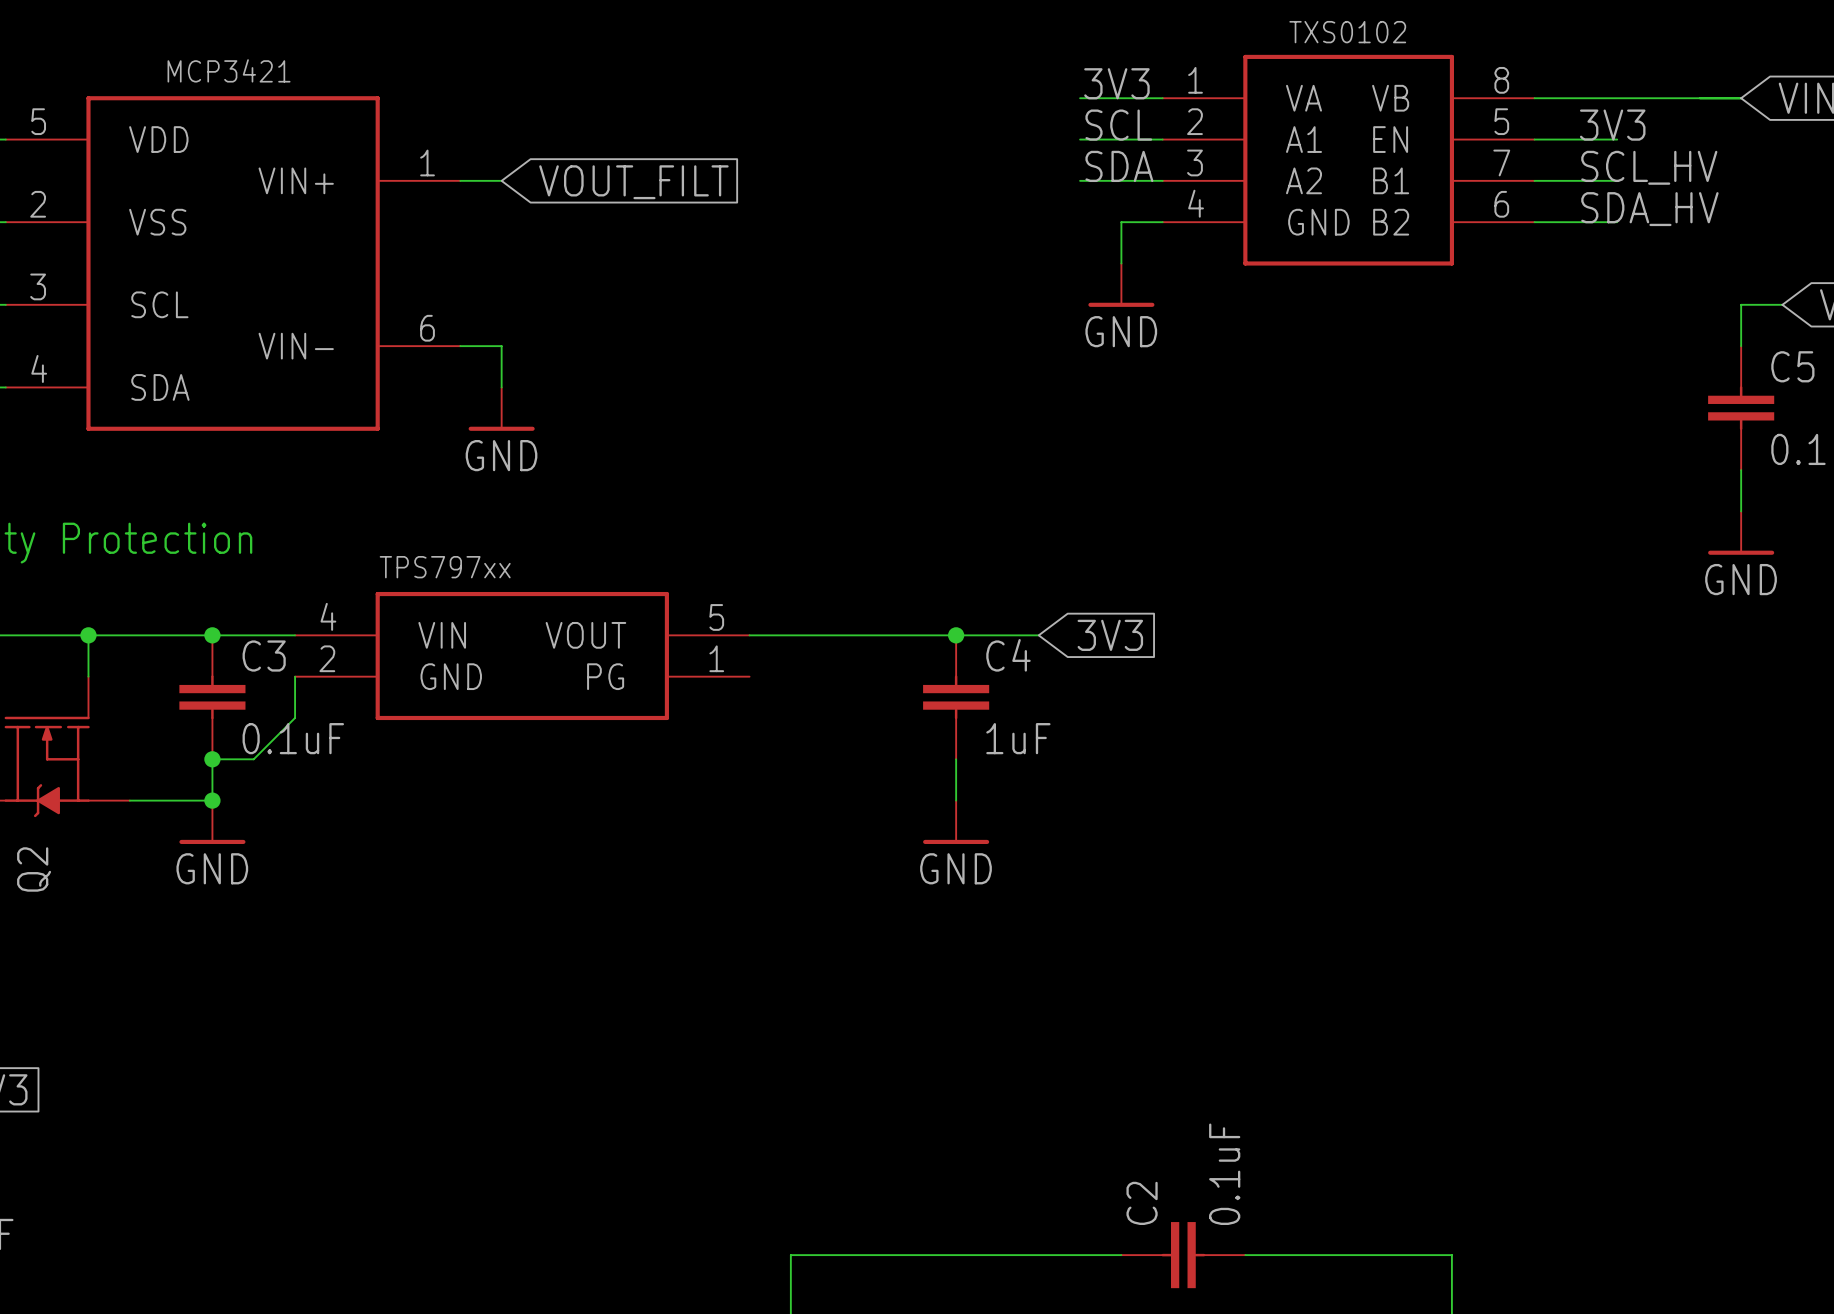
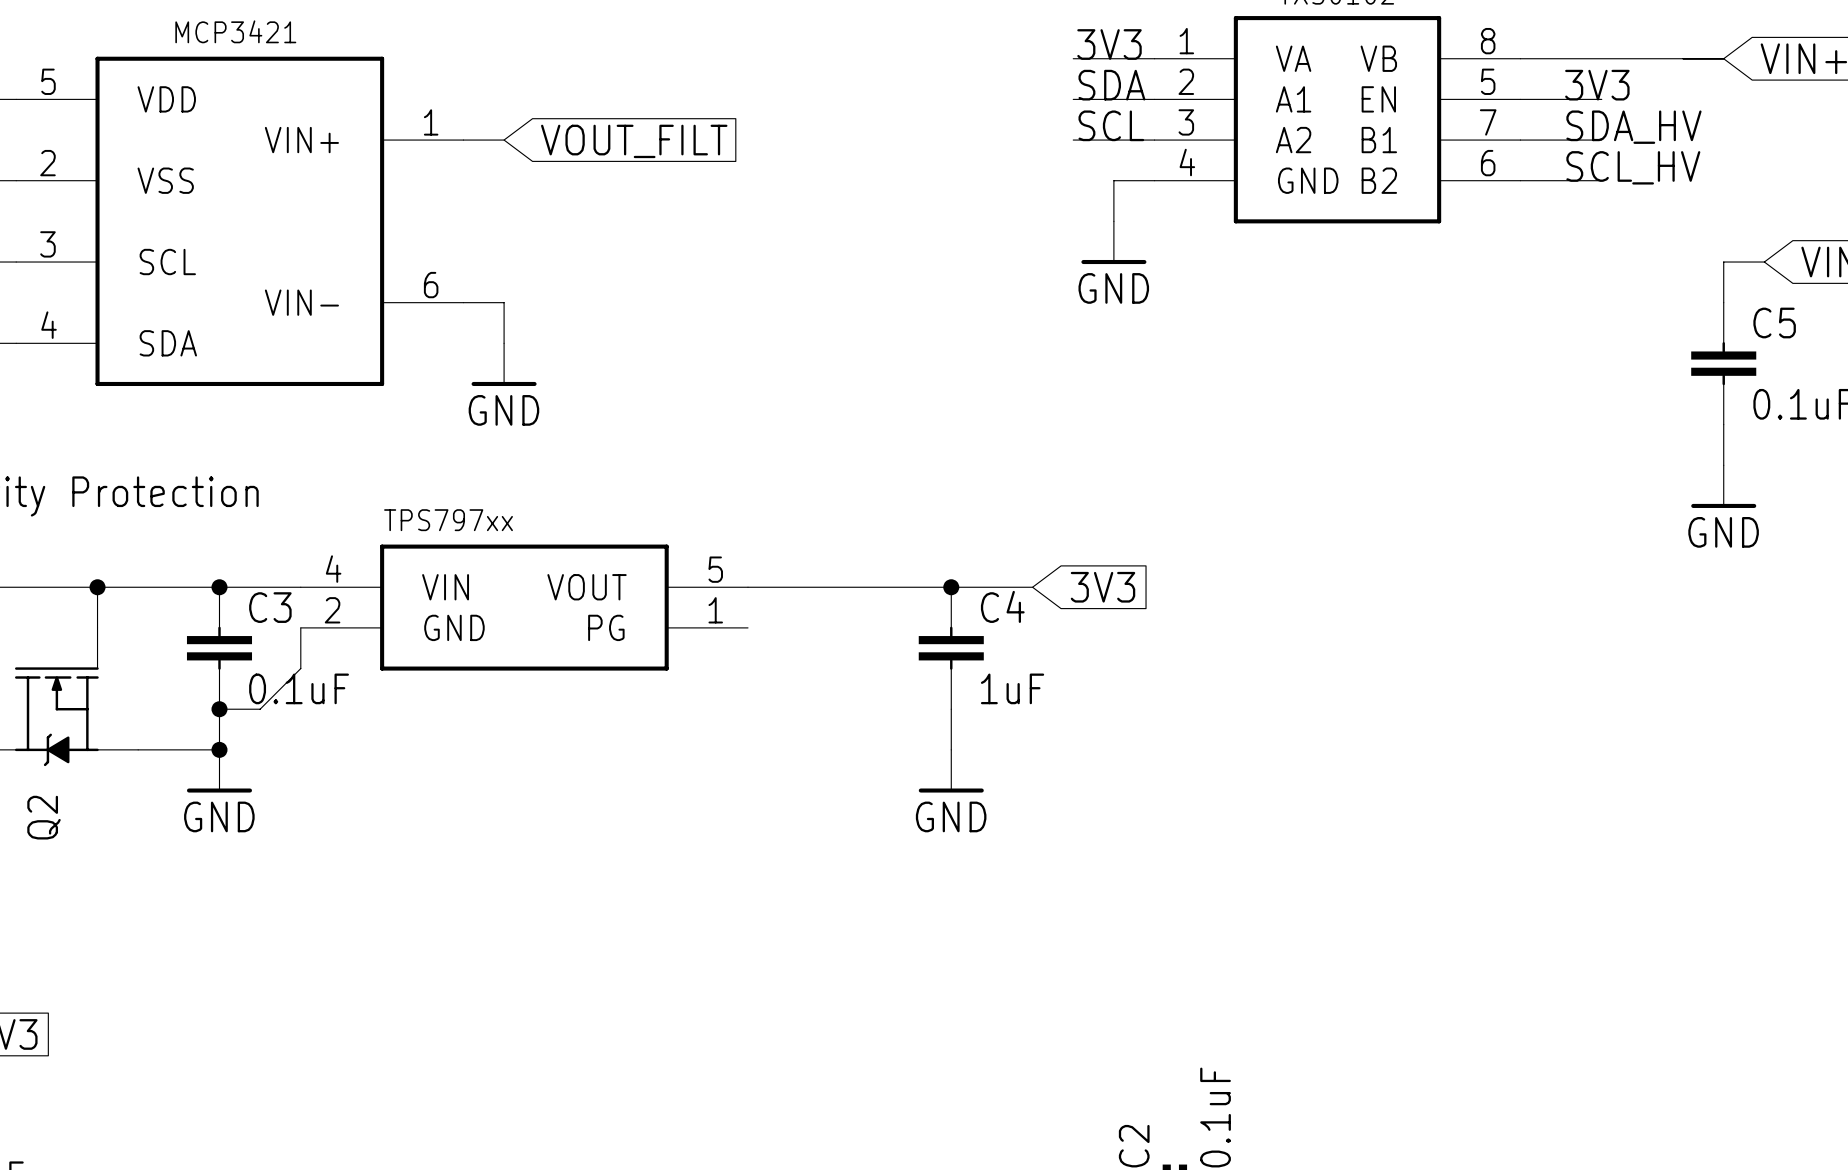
label: SCL (1118, 125) -> SDA (1111, 85)
label: SDA (1119, 166) -> SCL (1111, 125)
label: SCL_HV (1649, 167) -> SDA_HV (1633, 127)
label: SDA_HV (1649, 209) -> SCL_HV (1633, 167)

